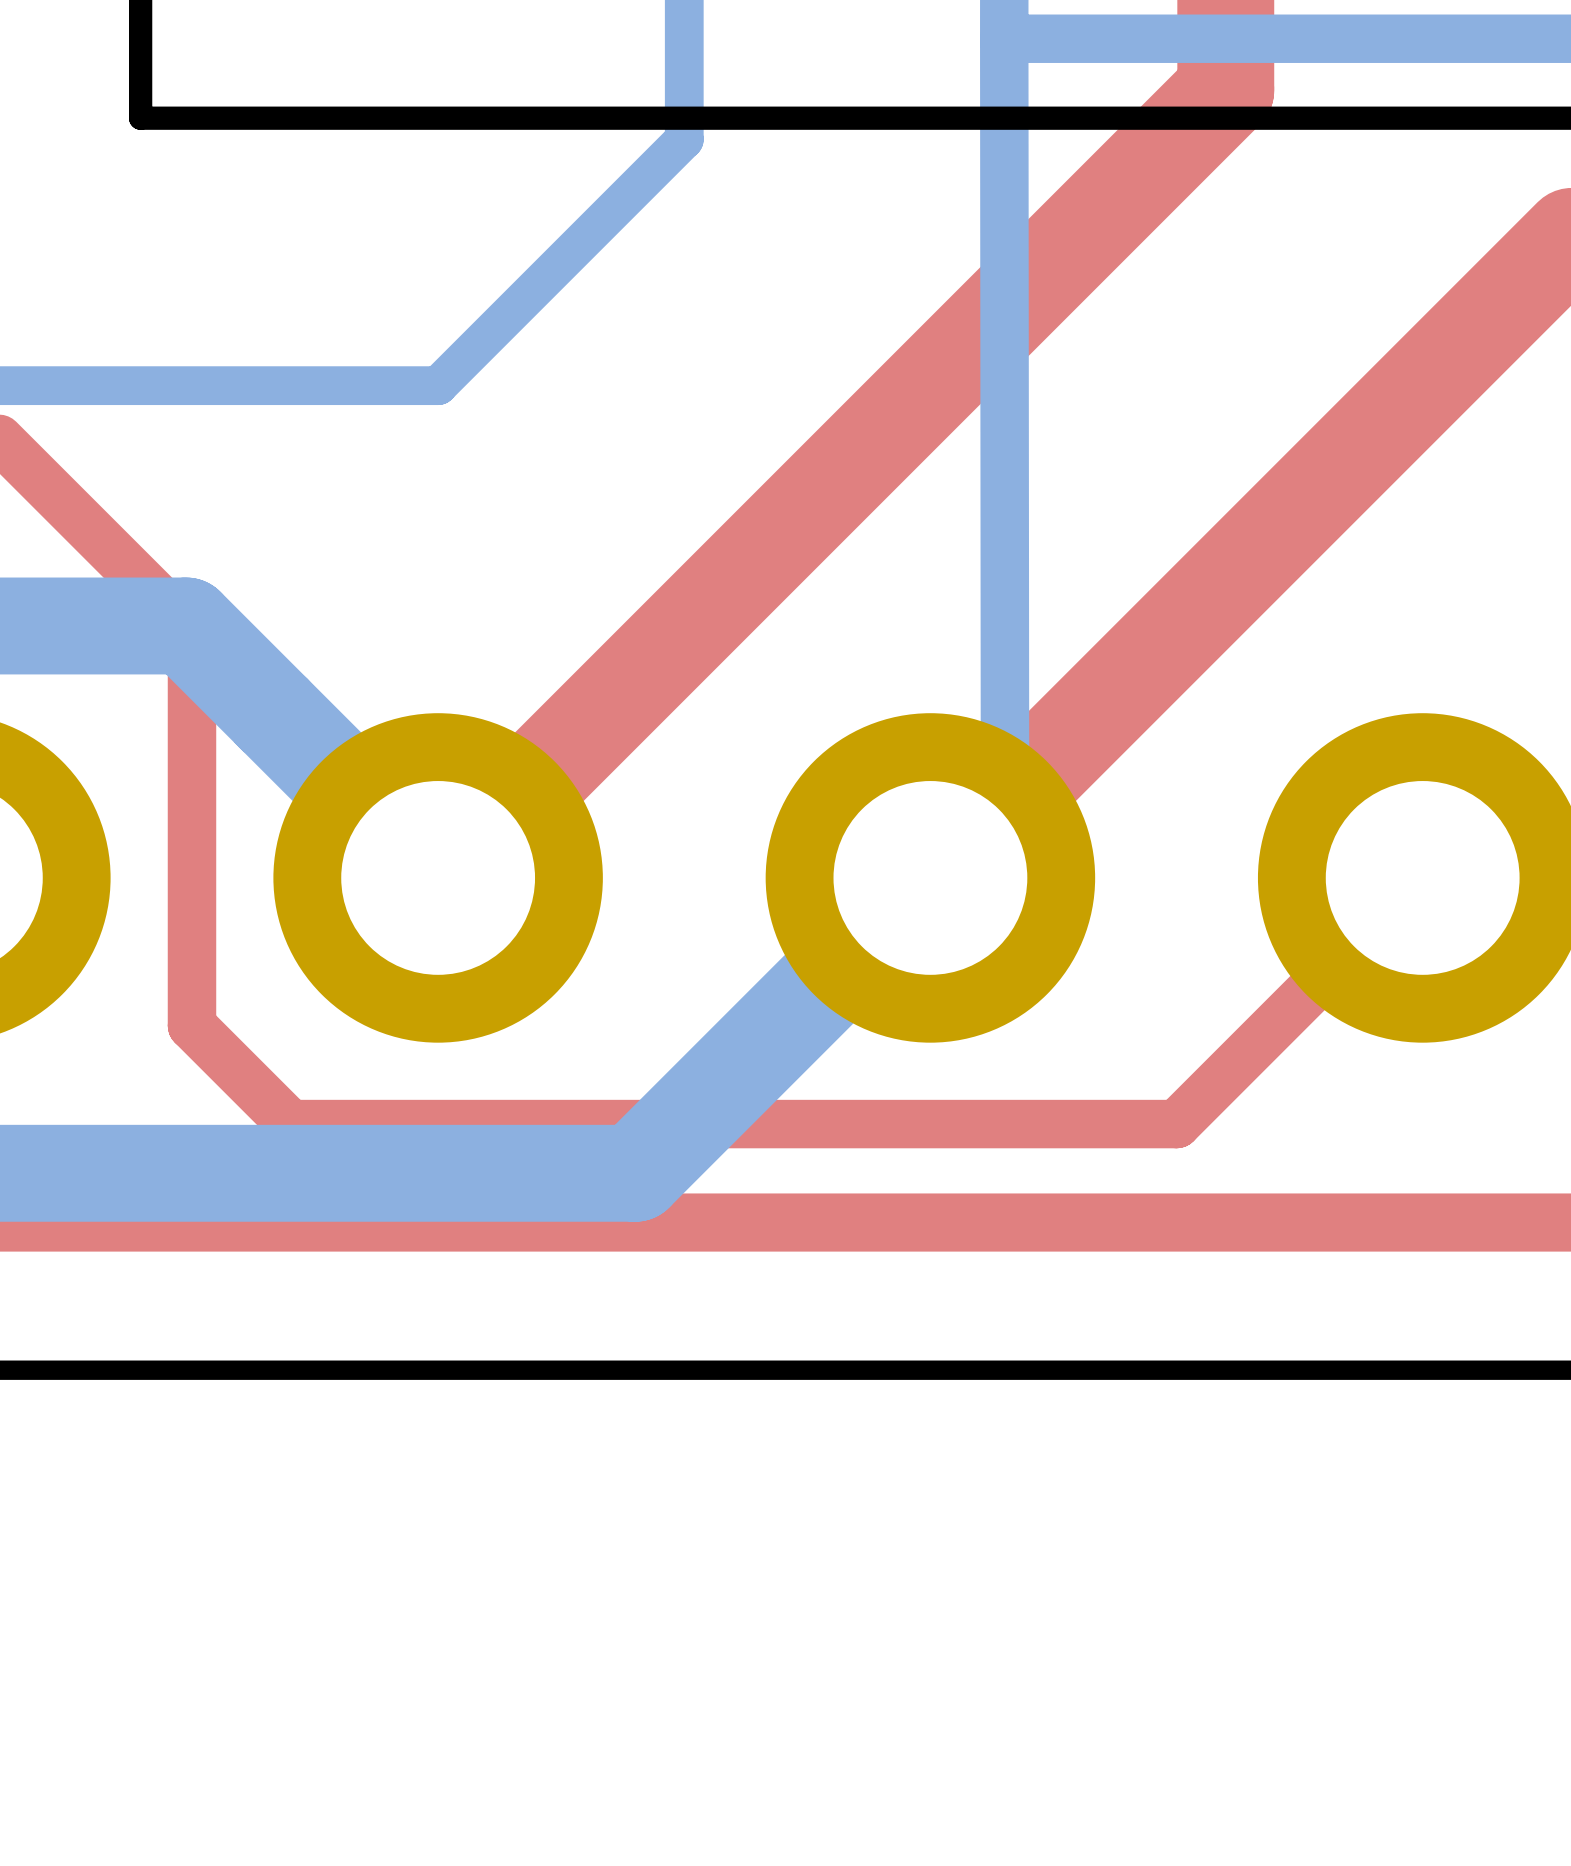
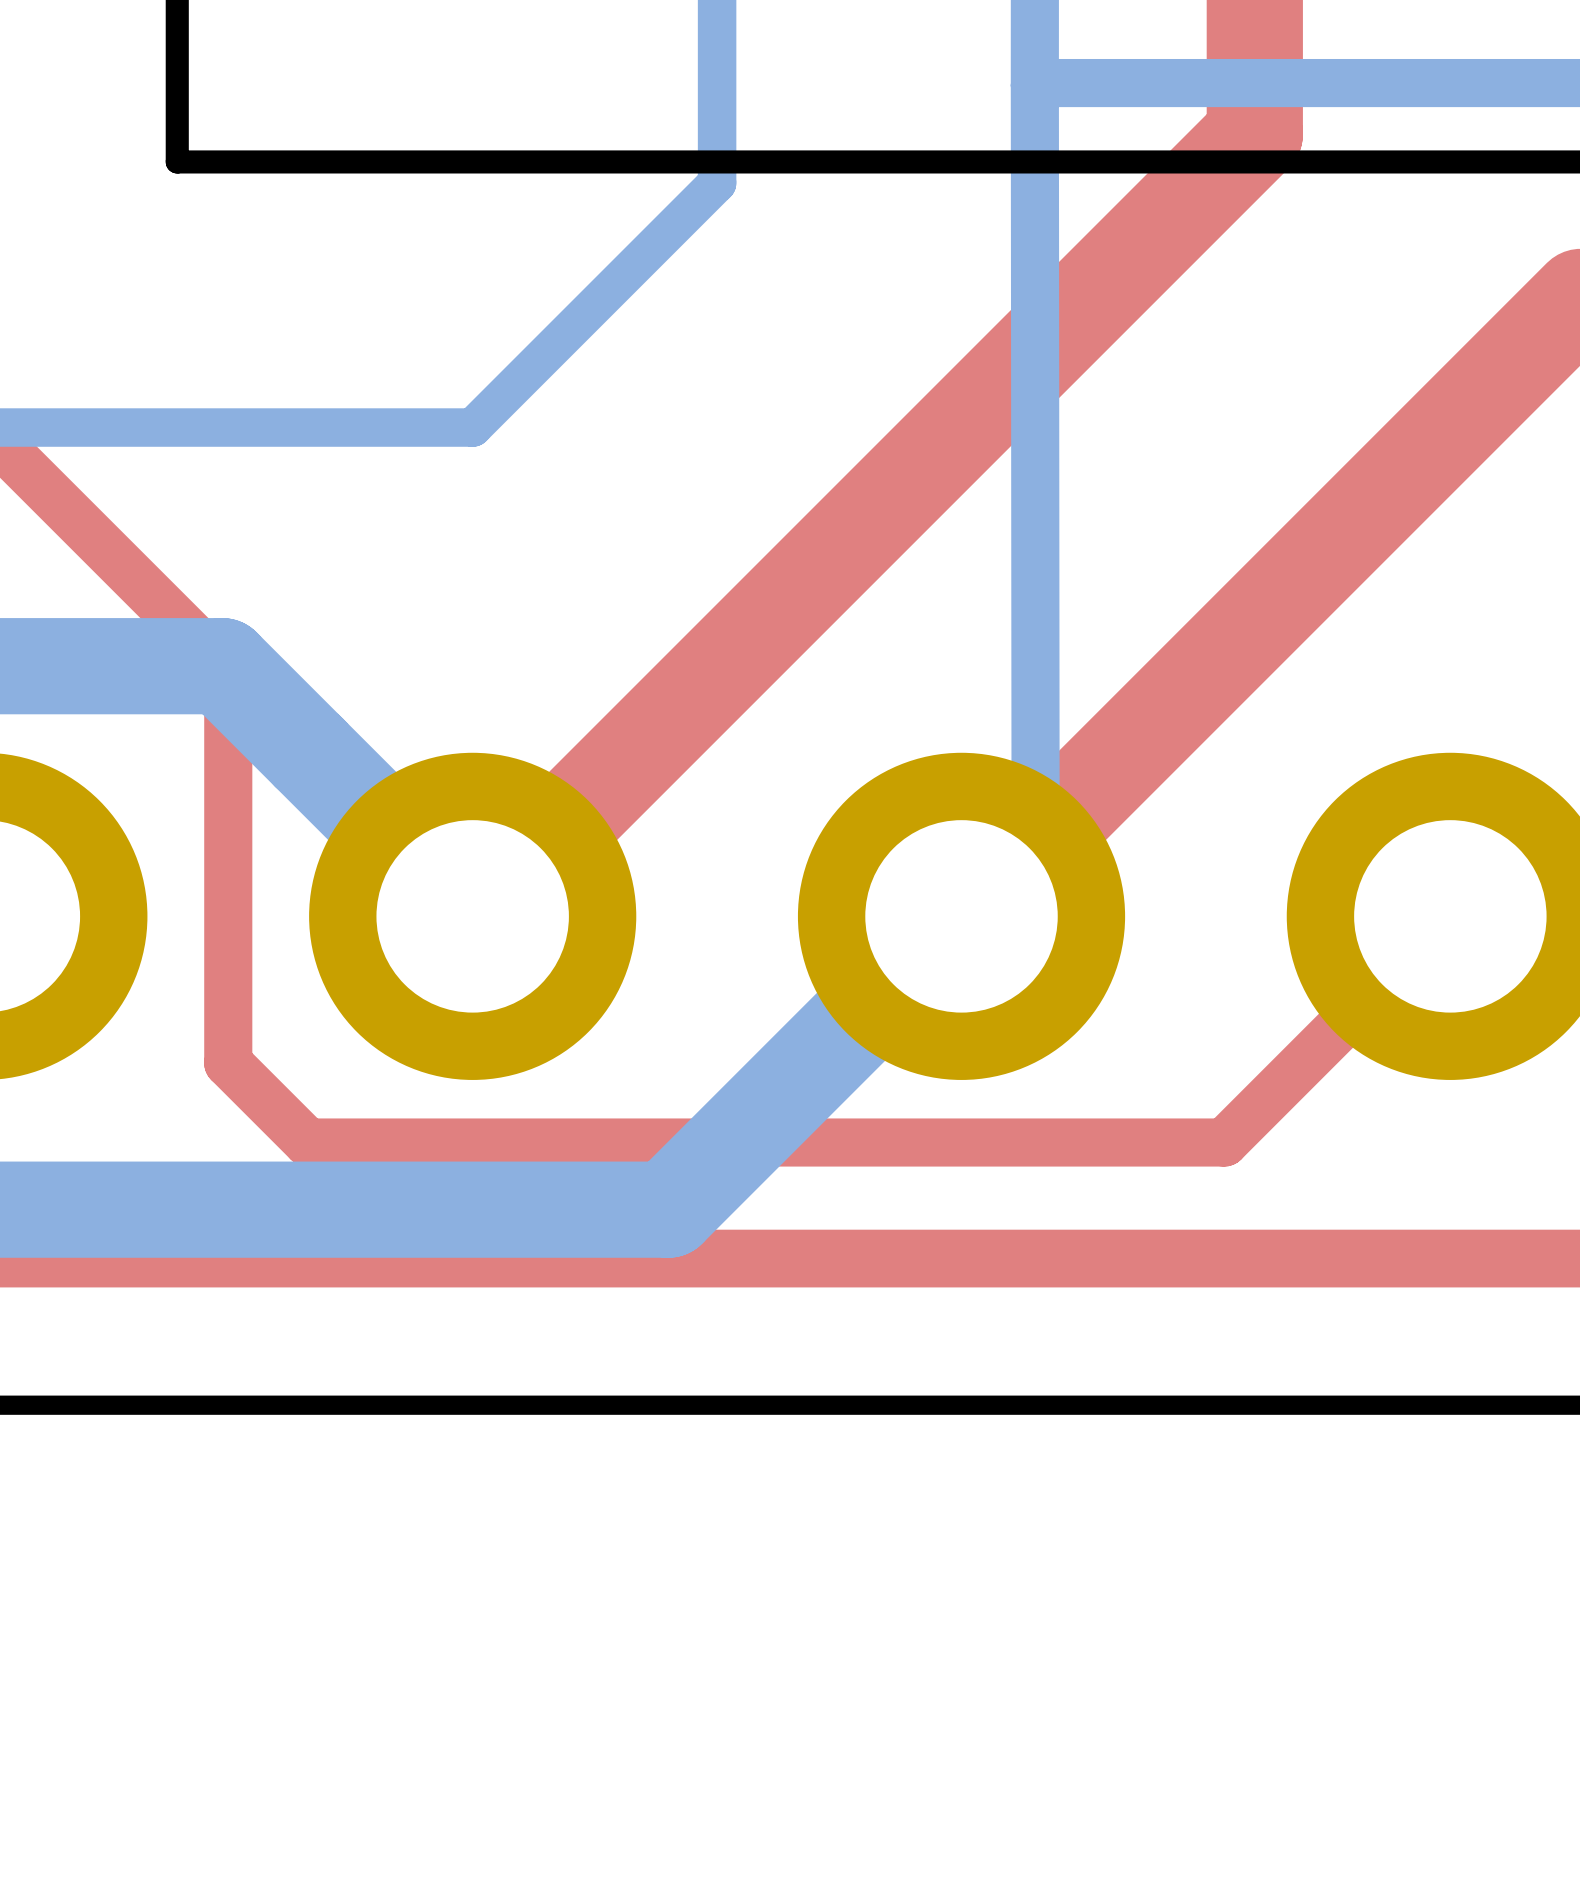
top track: (1194, 1105) (1176, 1124) (290, 1124) (272, 1105) -> (1224, 1142) (307, 1142)

